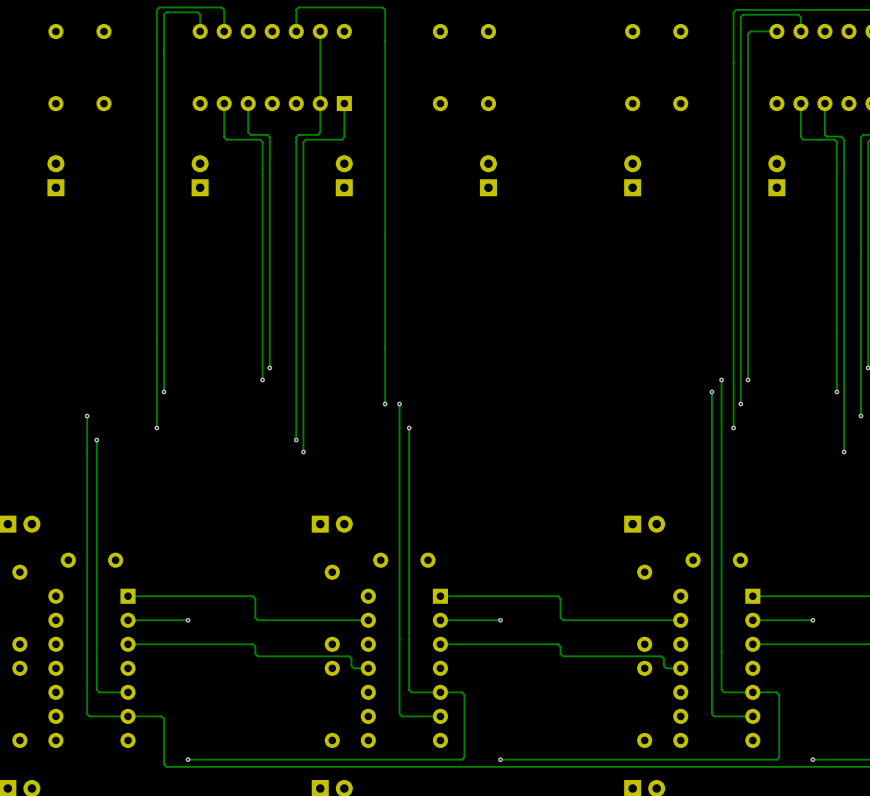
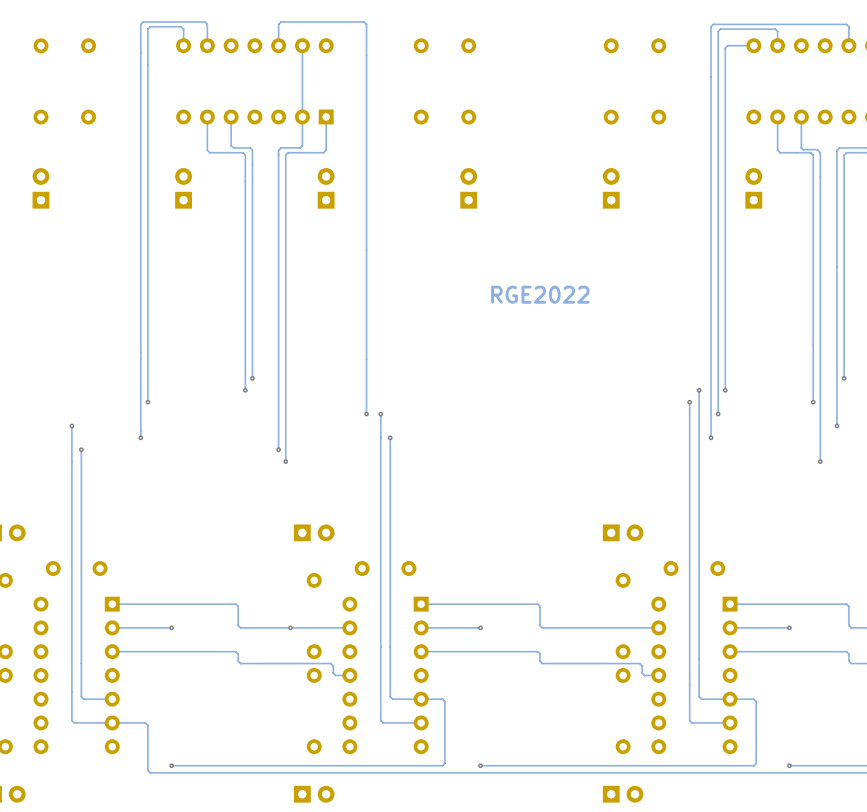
text: none -> RGE2022 (540, 294)
via: none -> (290, 627)

